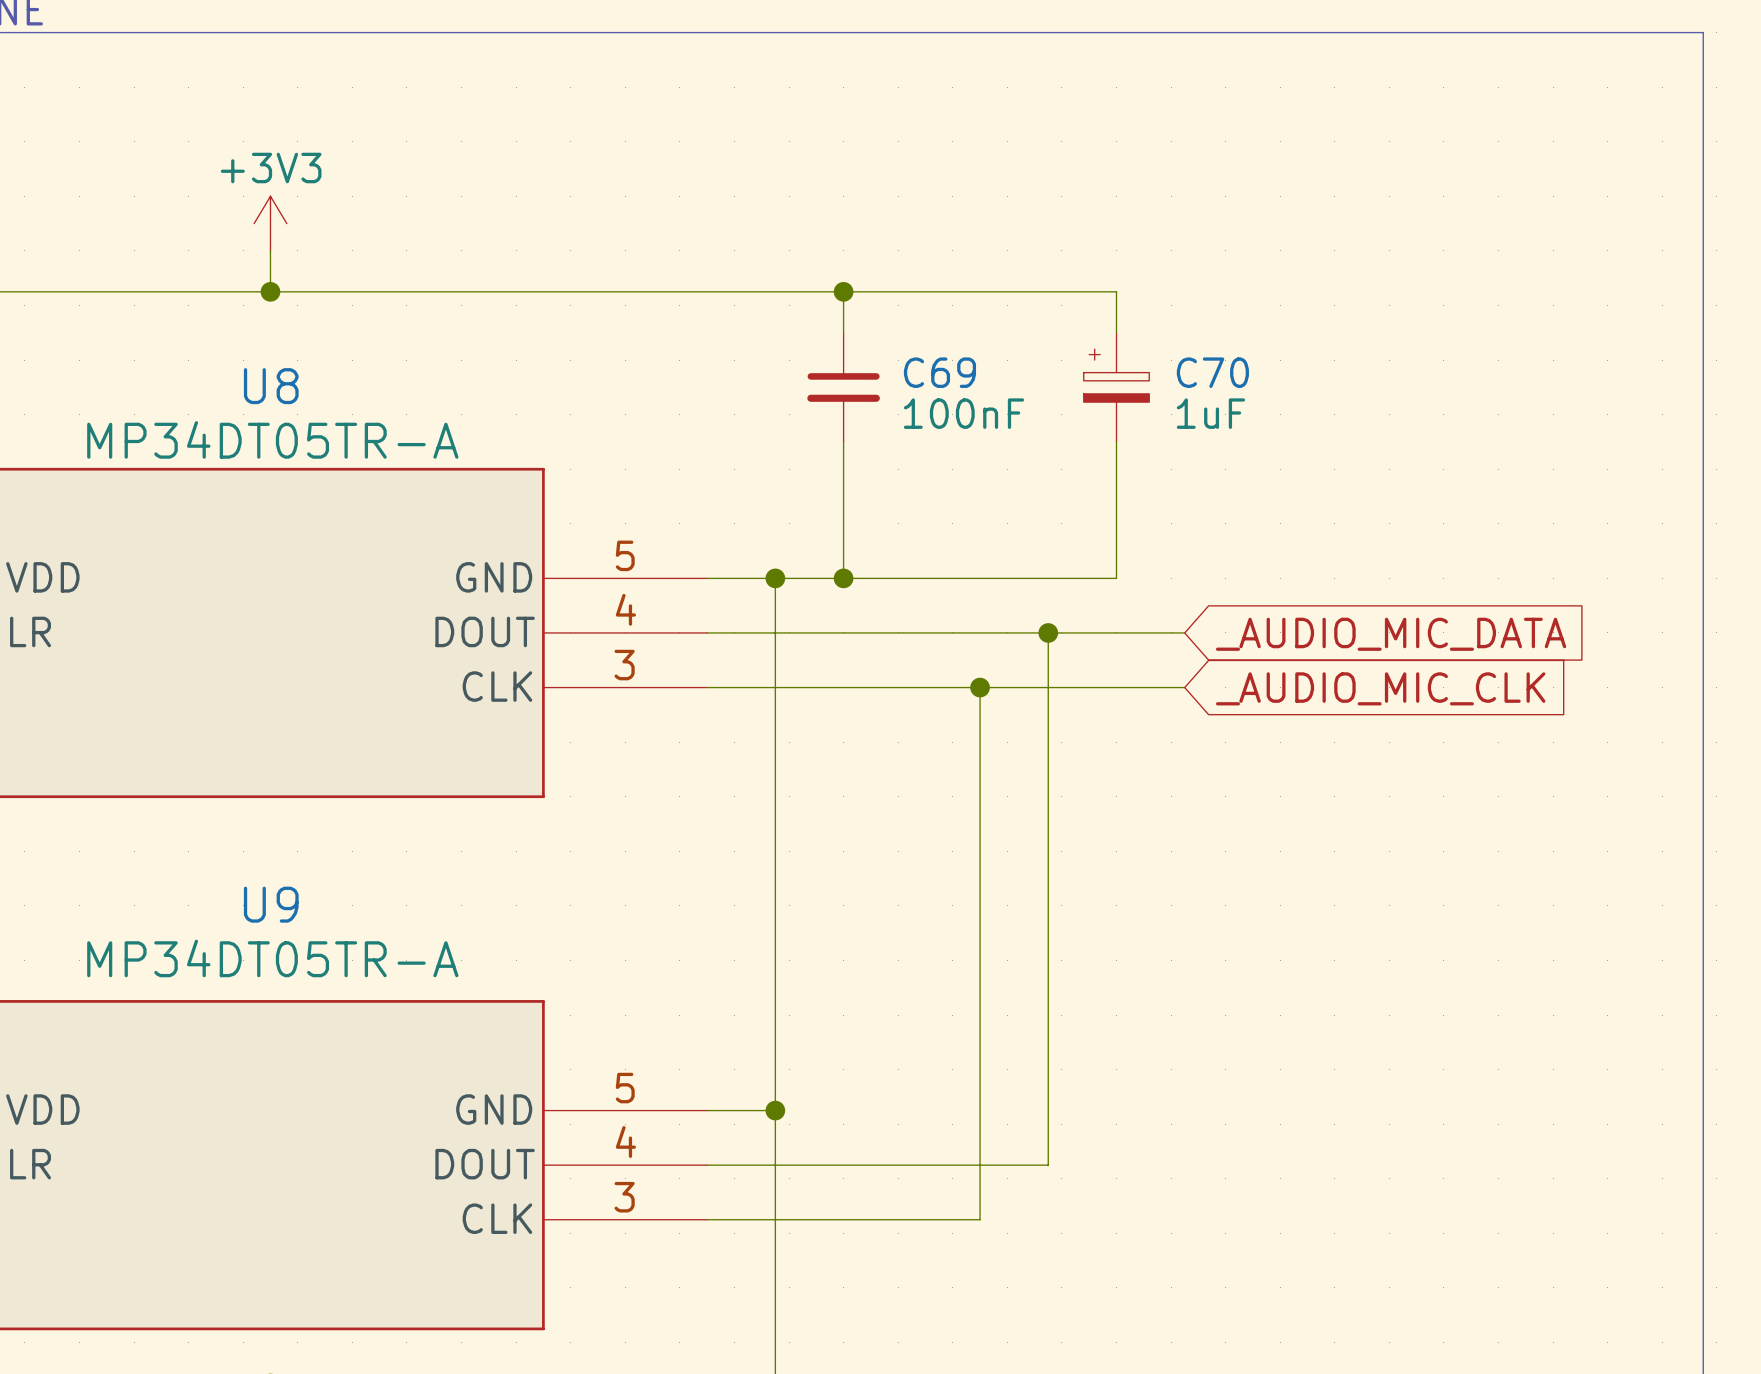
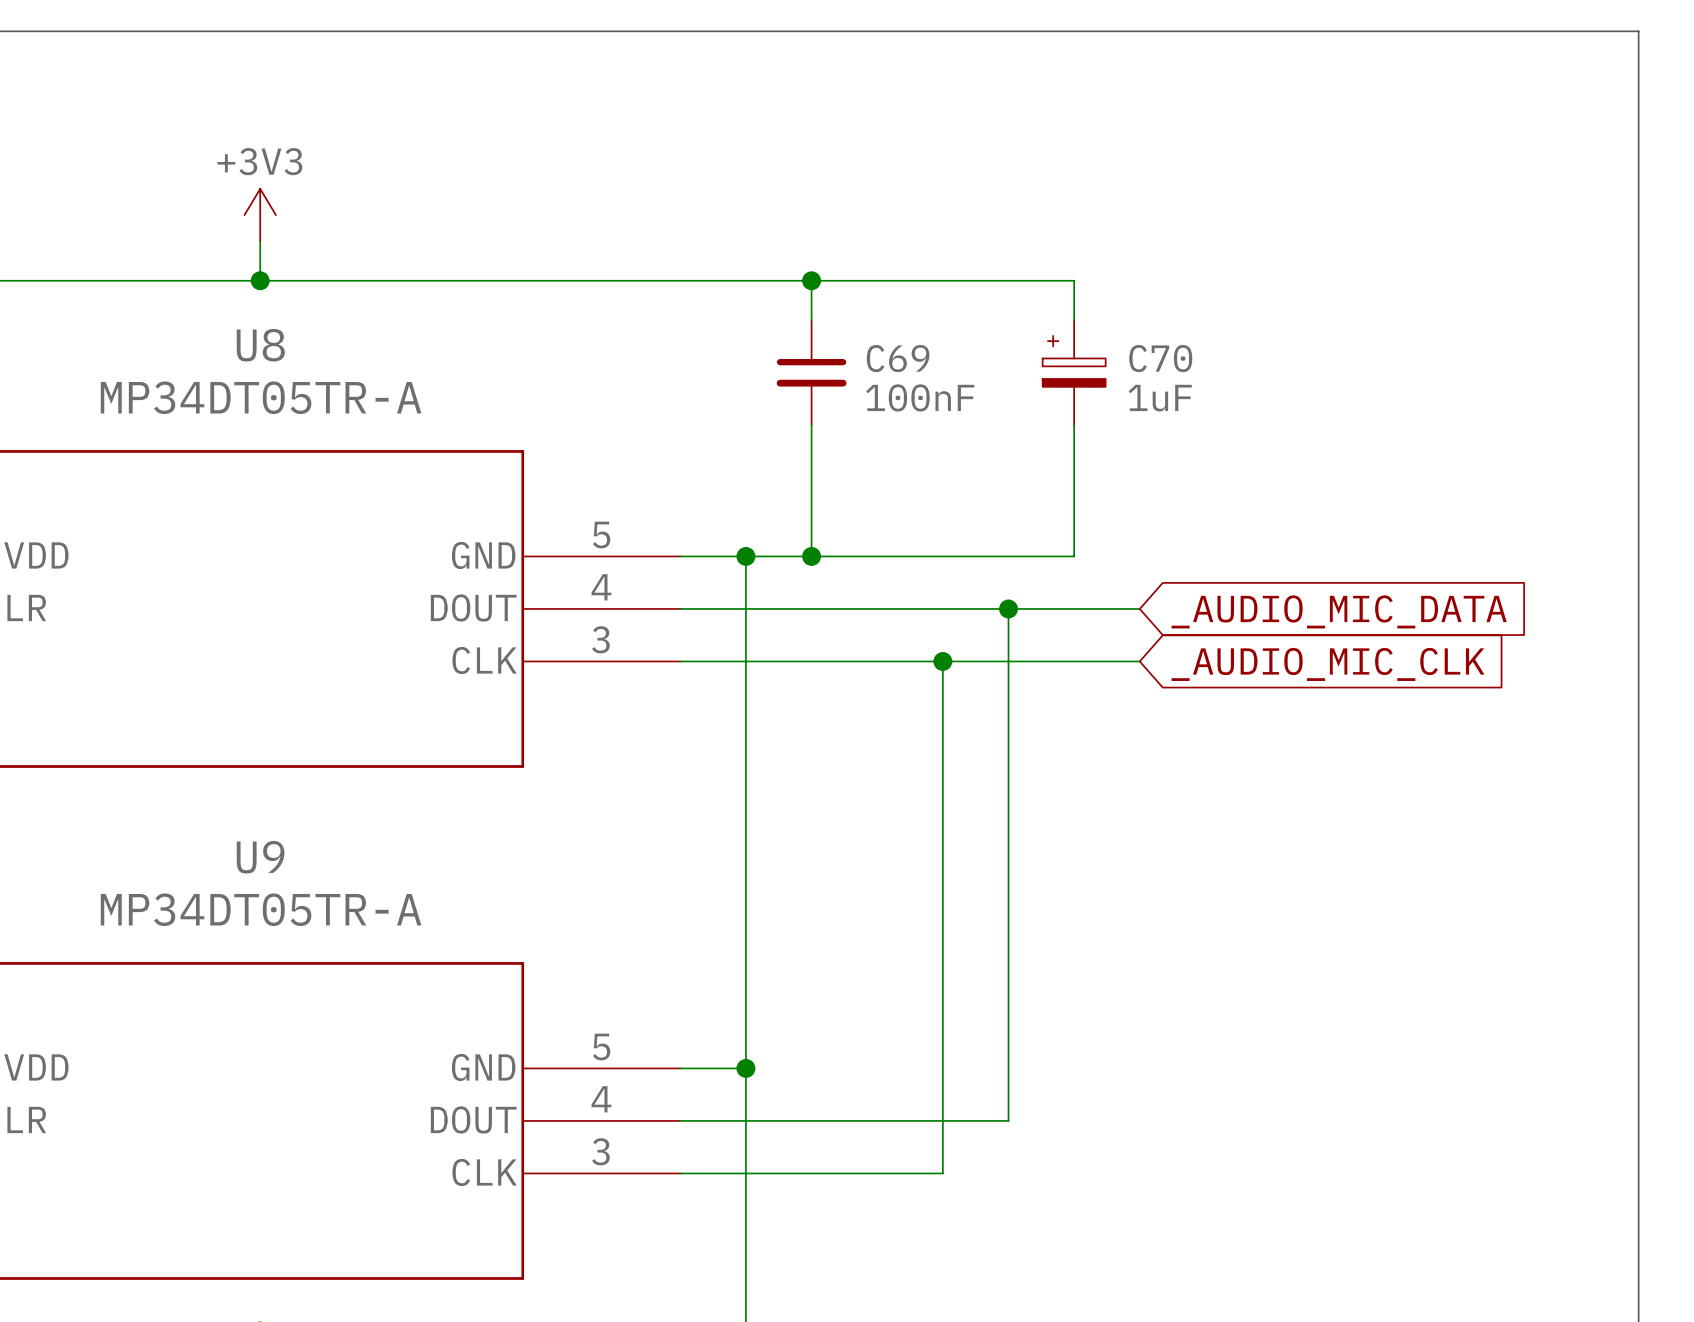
U8 name position: U8 (271, 386) -> U8 (260, 345)
U8 value position: MP34DT05TR-A (272, 439) -> MP34DT05TR-A (261, 397)
U9 name position: U9 (271, 904) -> U9 (260, 857)
U9 value position: MP34DT05TR-A (272, 958) -> MP34DT05TR-A (261, 909)

